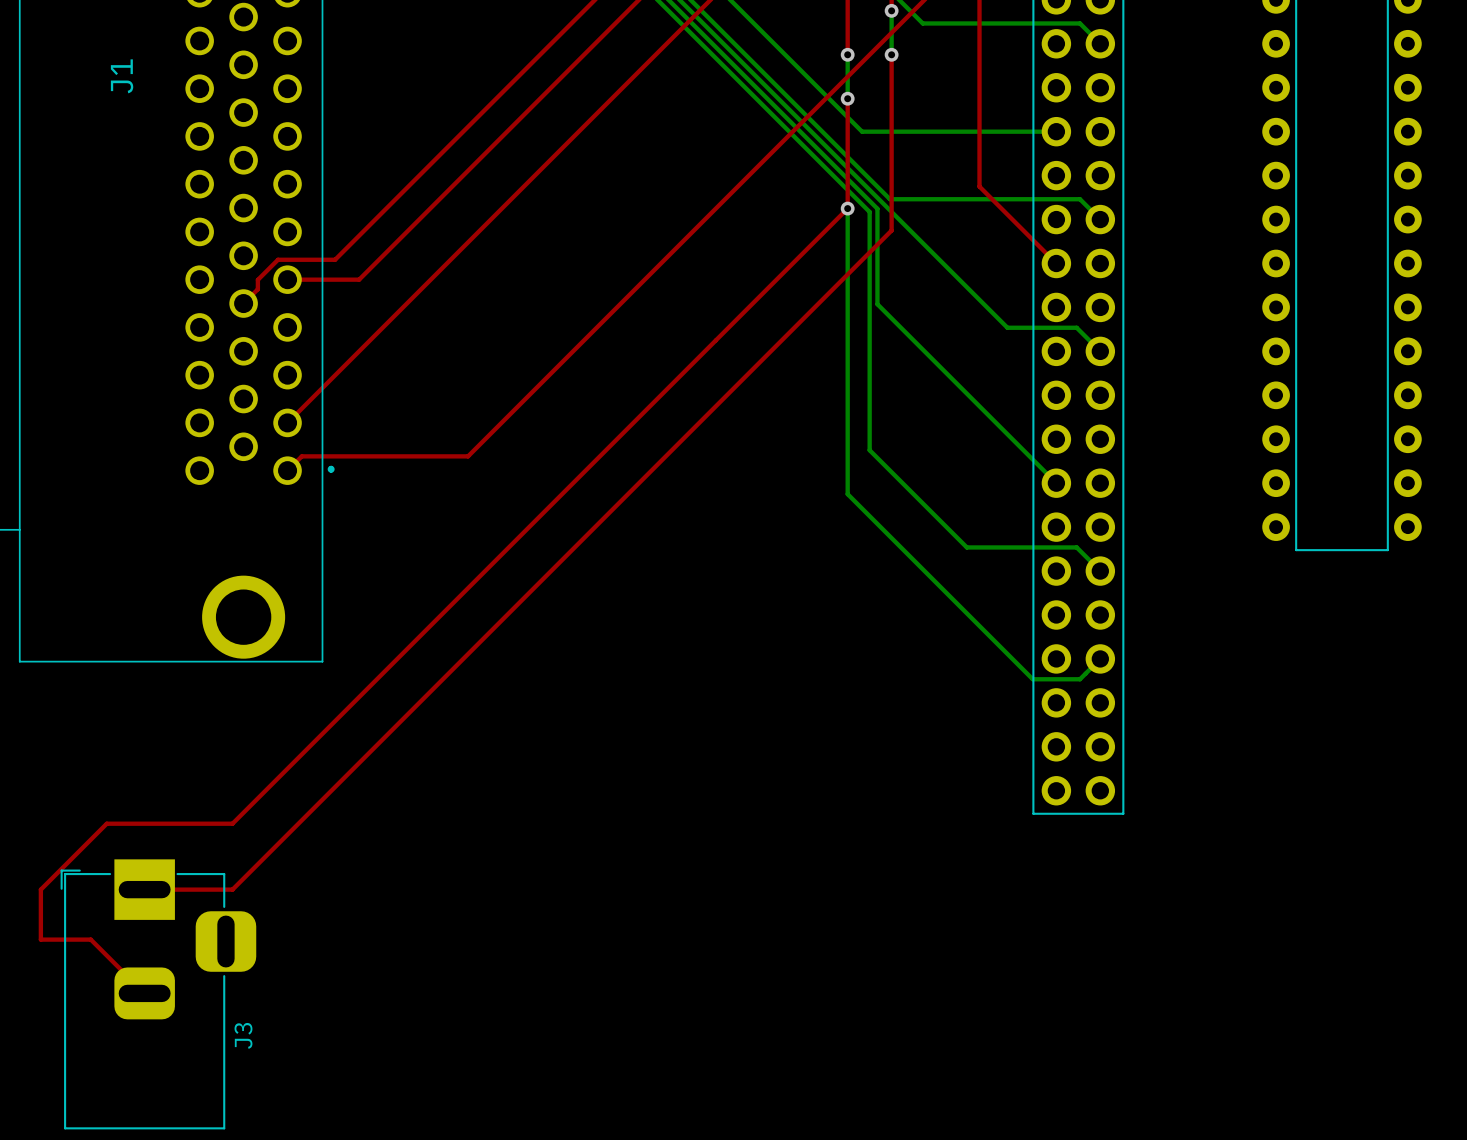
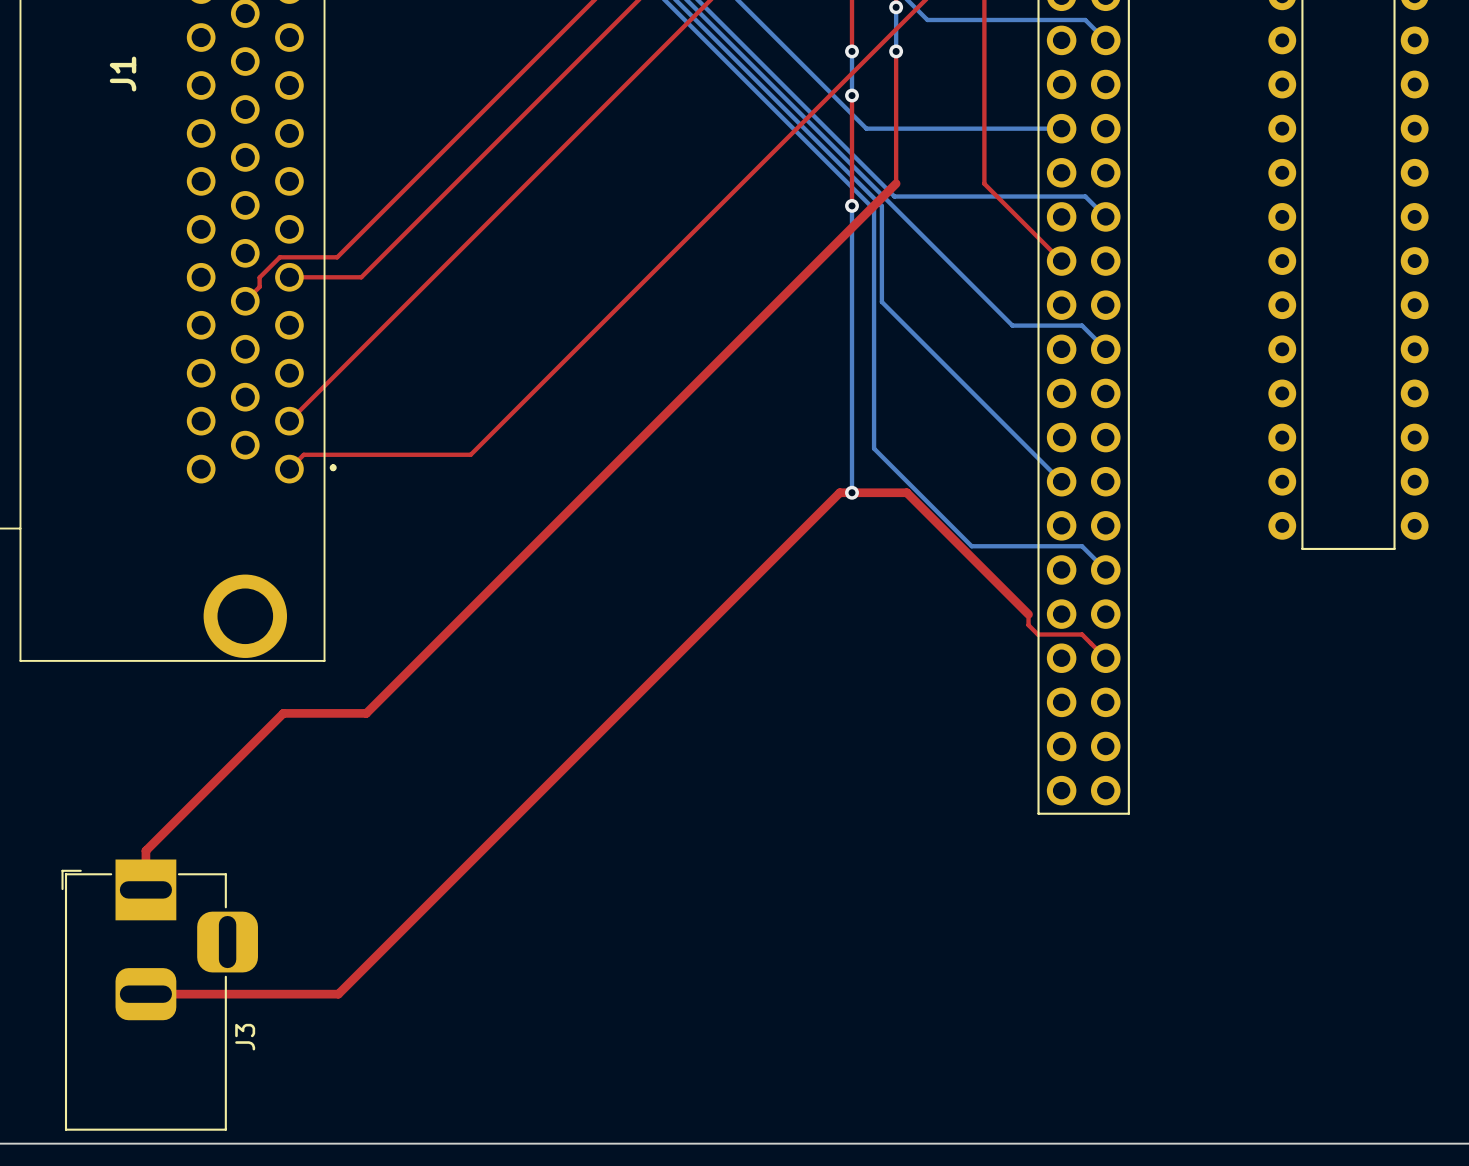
top track: (891, 186) (891, 230) (232, 889) (144, 889) -> (896, 183) (366, 713) (283, 713) (145, 850) (145, 889)
top track: (847, 208) (232, 823) (106, 823) (40, 889) (40, 939) (90, 939) (144, 993) -> (1105, 658) (1082, 634) (1037, 634) (1028, 625) (1028, 614) (906, 492) (839, 492) (338, 994) (145, 994)
bottom track: (847, 494) (1032, 679) (1080, 679) (1100, 658) -> none
via: none -> (852, 492)

